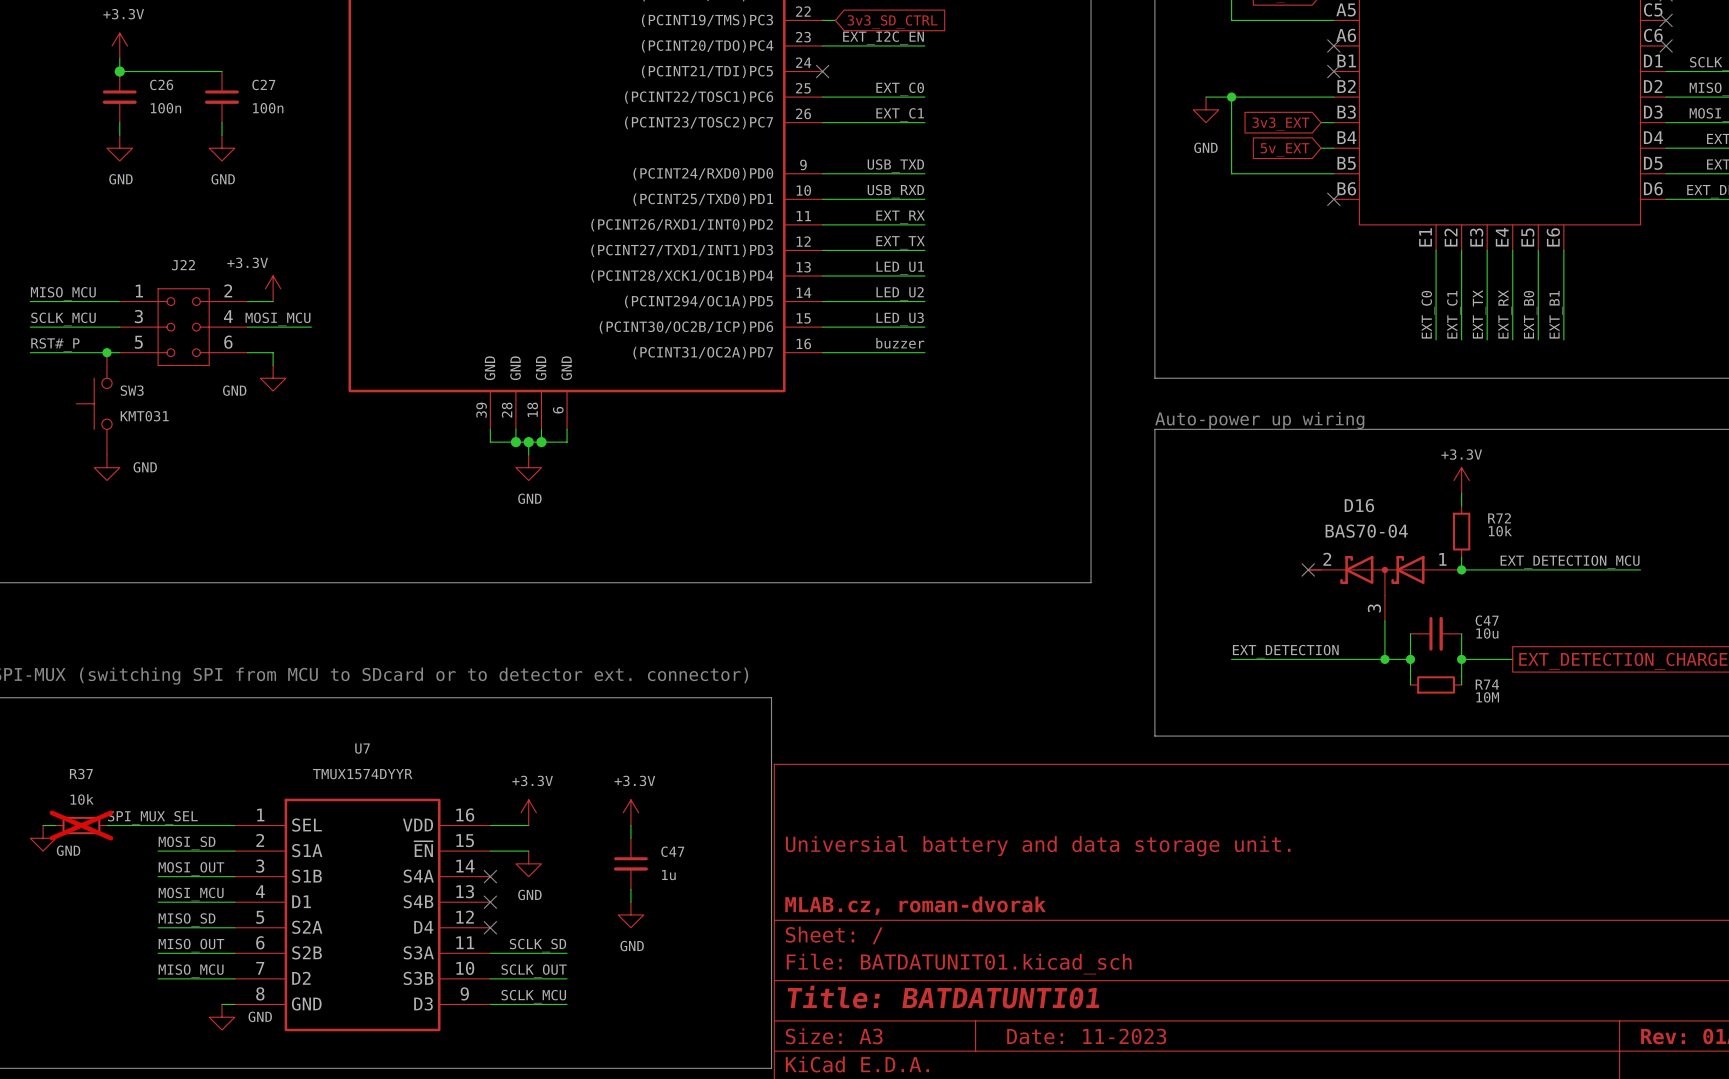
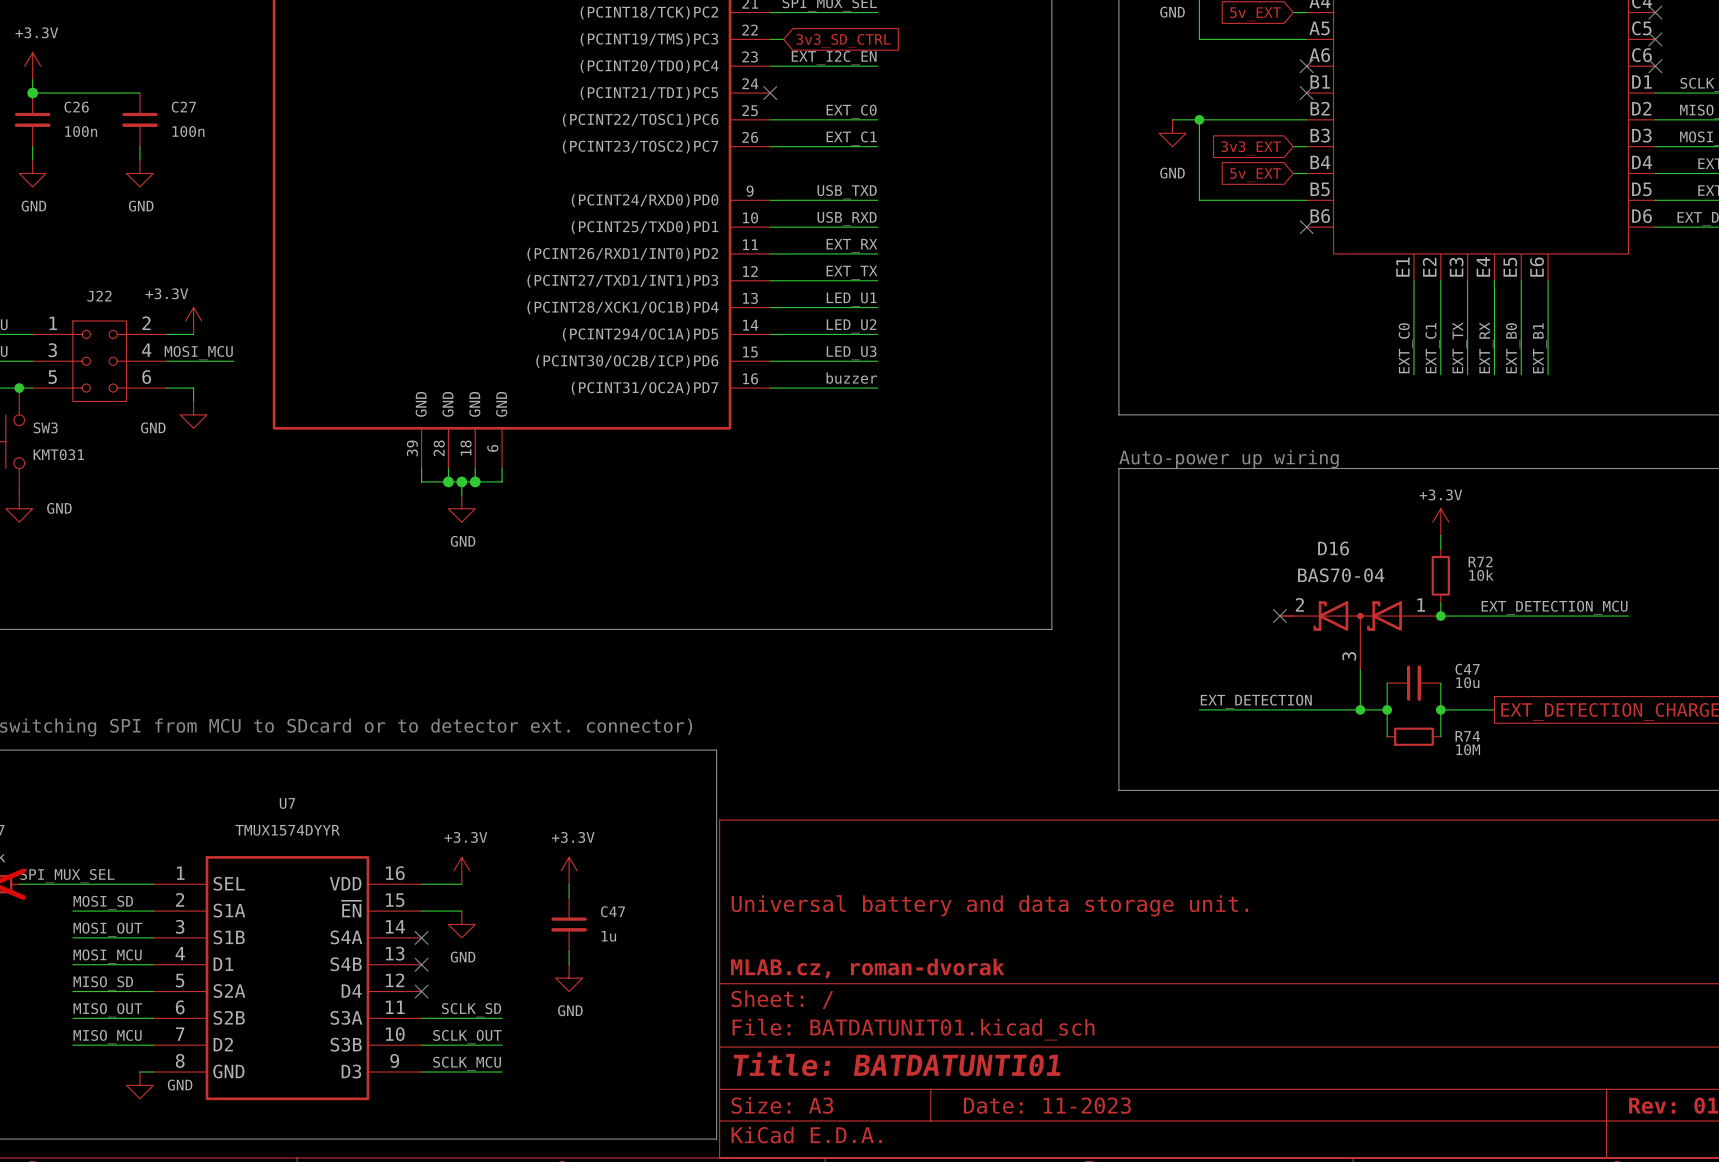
title block: Universial battery and data storage unit. (1038, 846) -> Universal battery and data storage unit. (989, 905)

